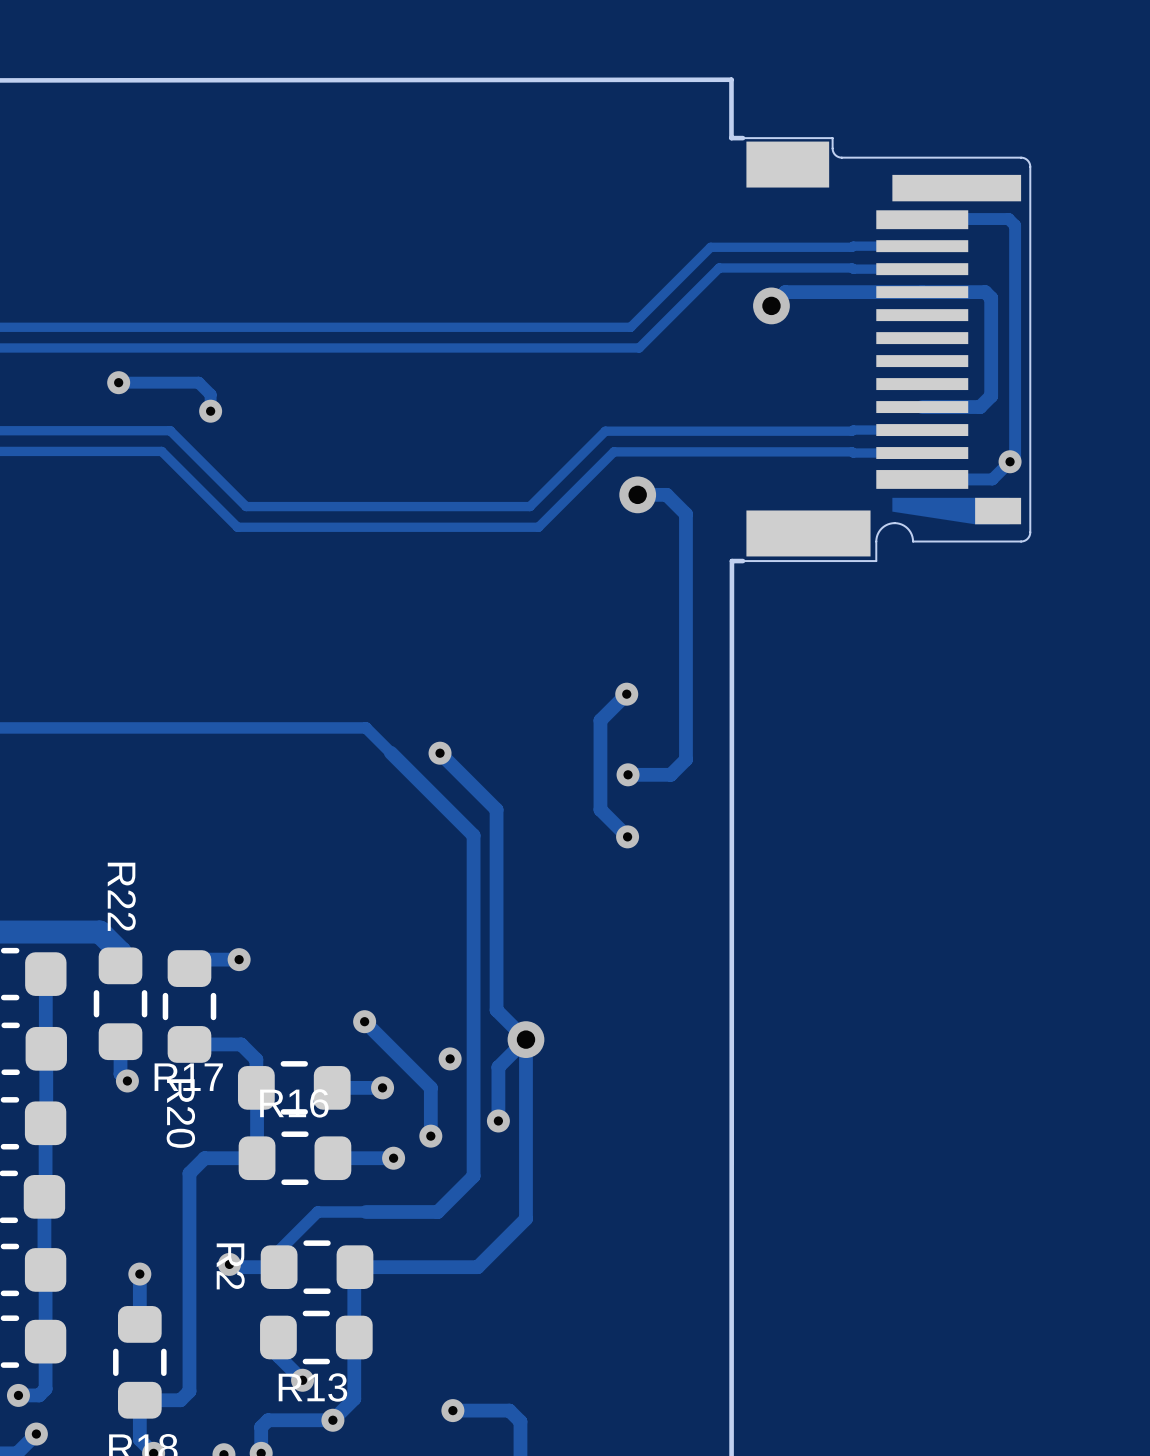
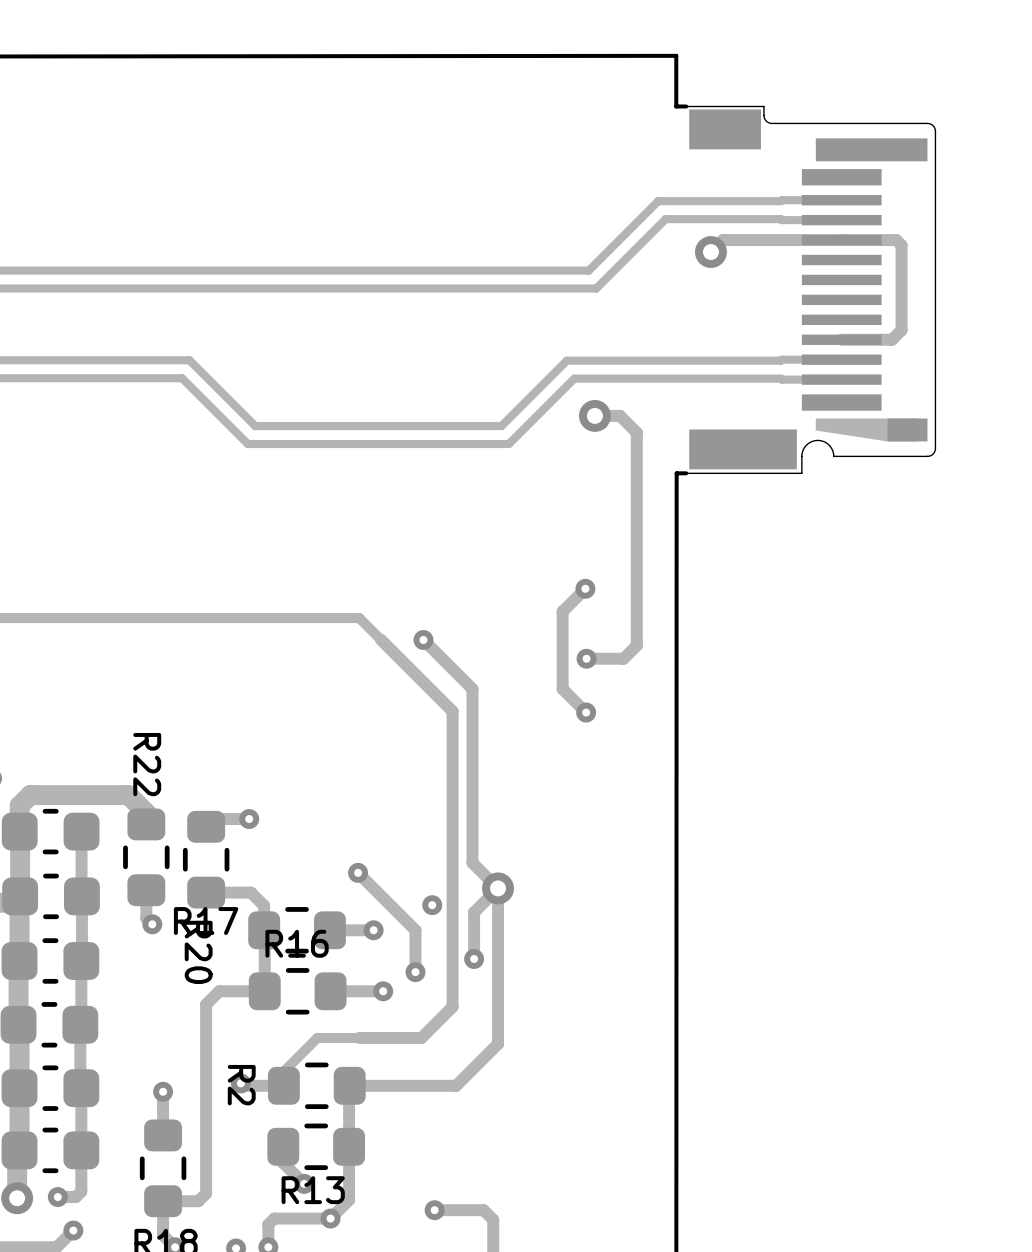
track: (922, 219) (1008, 219) (1015, 225) (1015, 456) (992, 479) (922, 479) -> none
track: (118, 382) (198, 382) (210, 394) (210, 411) -> none
via: (118, 382) -> none
via: (210, 411) -> none
via: (1010, 461) -> none

